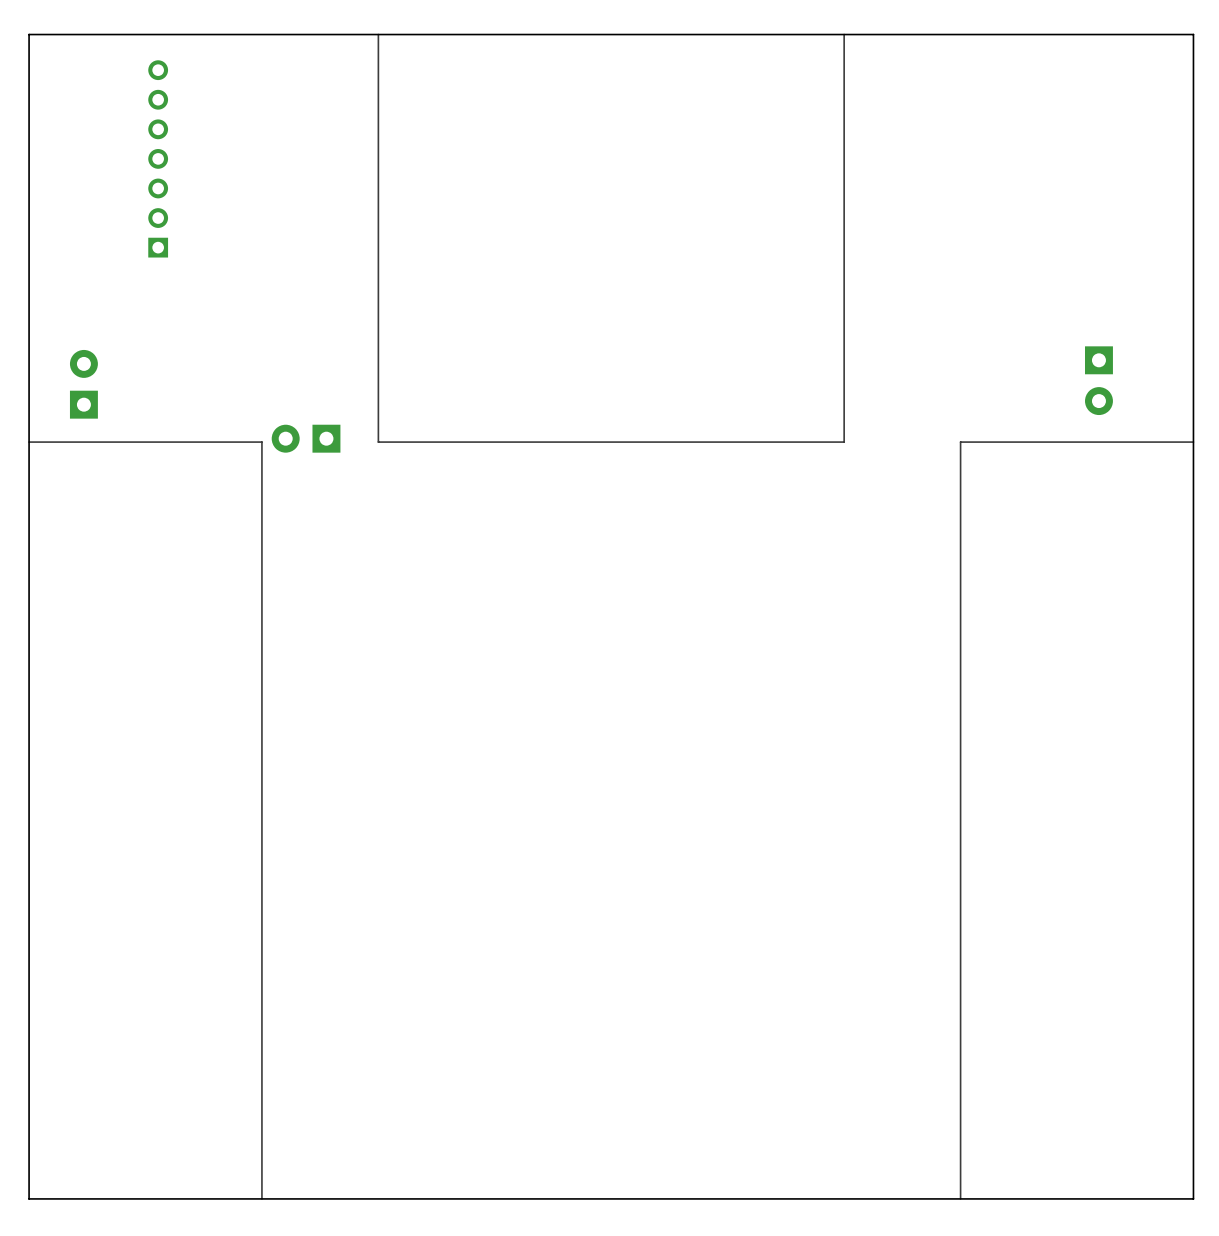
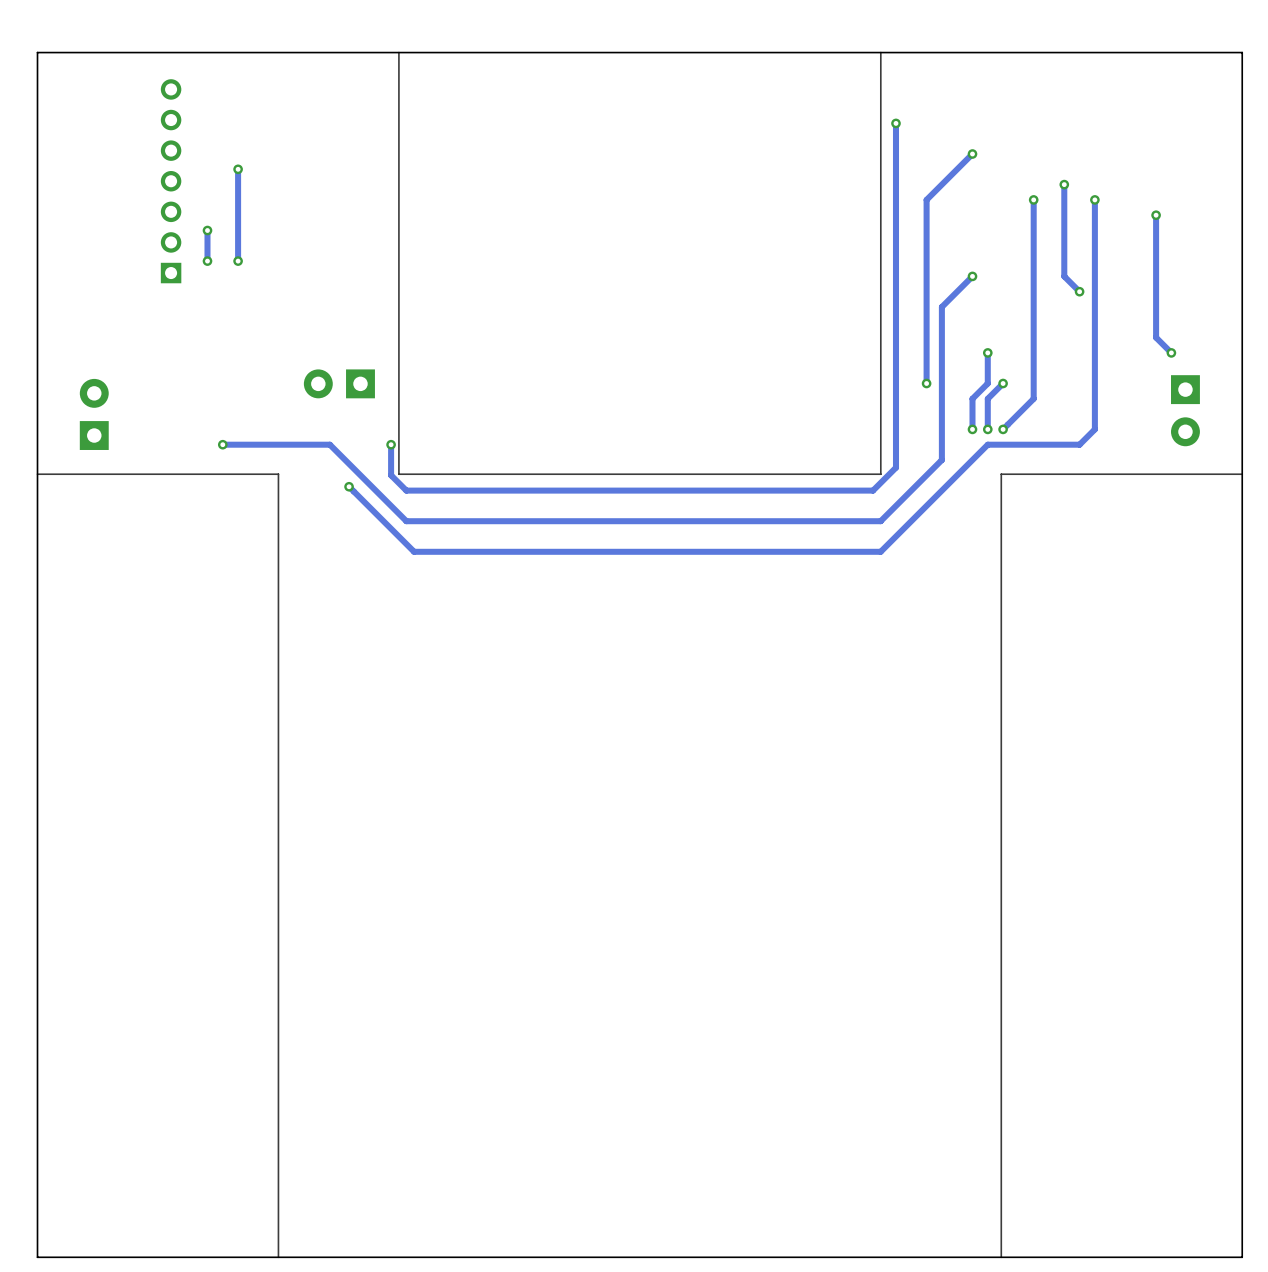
track: none -> (895, 123) (895, 467) (873, 490) (406, 490) (391, 475) (391, 444)
via: none -> (895, 123)
track: none -> (972, 154) (926, 199) (926, 383)
via: none -> (972, 154)
track: none -> (238, 169) (238, 261)
via: none -> (238, 169)
track: none -> (1064, 184) (1064, 276) (1079, 291)
via: none -> (1064, 184)
track: none -> (1033, 199) (1033, 398) (1003, 429)
via: none -> (1033, 199)
track: none -> (1094, 199) (1094, 429) (1079, 444) (987, 444) (880, 551) (414, 551) (349, 486)
via: none -> (1094, 199)
track: none -> (1156, 215) (1156, 337) (1171, 352)
via: none -> (1156, 215)
track: none -> (207, 230) (207, 261)
via: none -> (207, 230)
via: none -> (207, 261)
via: none -> (238, 261)
track: none -> (972, 276) (941, 307) (941, 460) (880, 521) (406, 521) (329, 444) (222, 444)
via: none -> (972, 276)
via: none -> (1079, 291)
track: none -> (987, 352) (987, 383) (972, 398) (972, 429)
via: none -> (987, 352)
via: none -> (1171, 352)
via: none -> (926, 383)
track: none -> (1003, 383) (987, 398) (987, 429)
via: none -> (1003, 383)
part position: (1098, 380) -> (1185, 410)
via: none -> (972, 429)
via: none -> (987, 429)
via: none -> (1003, 429)
via: none -> (222, 444)
via: none -> (391, 444)
part position: (306, 438) -> (339, 383)
via: none -> (349, 486)

